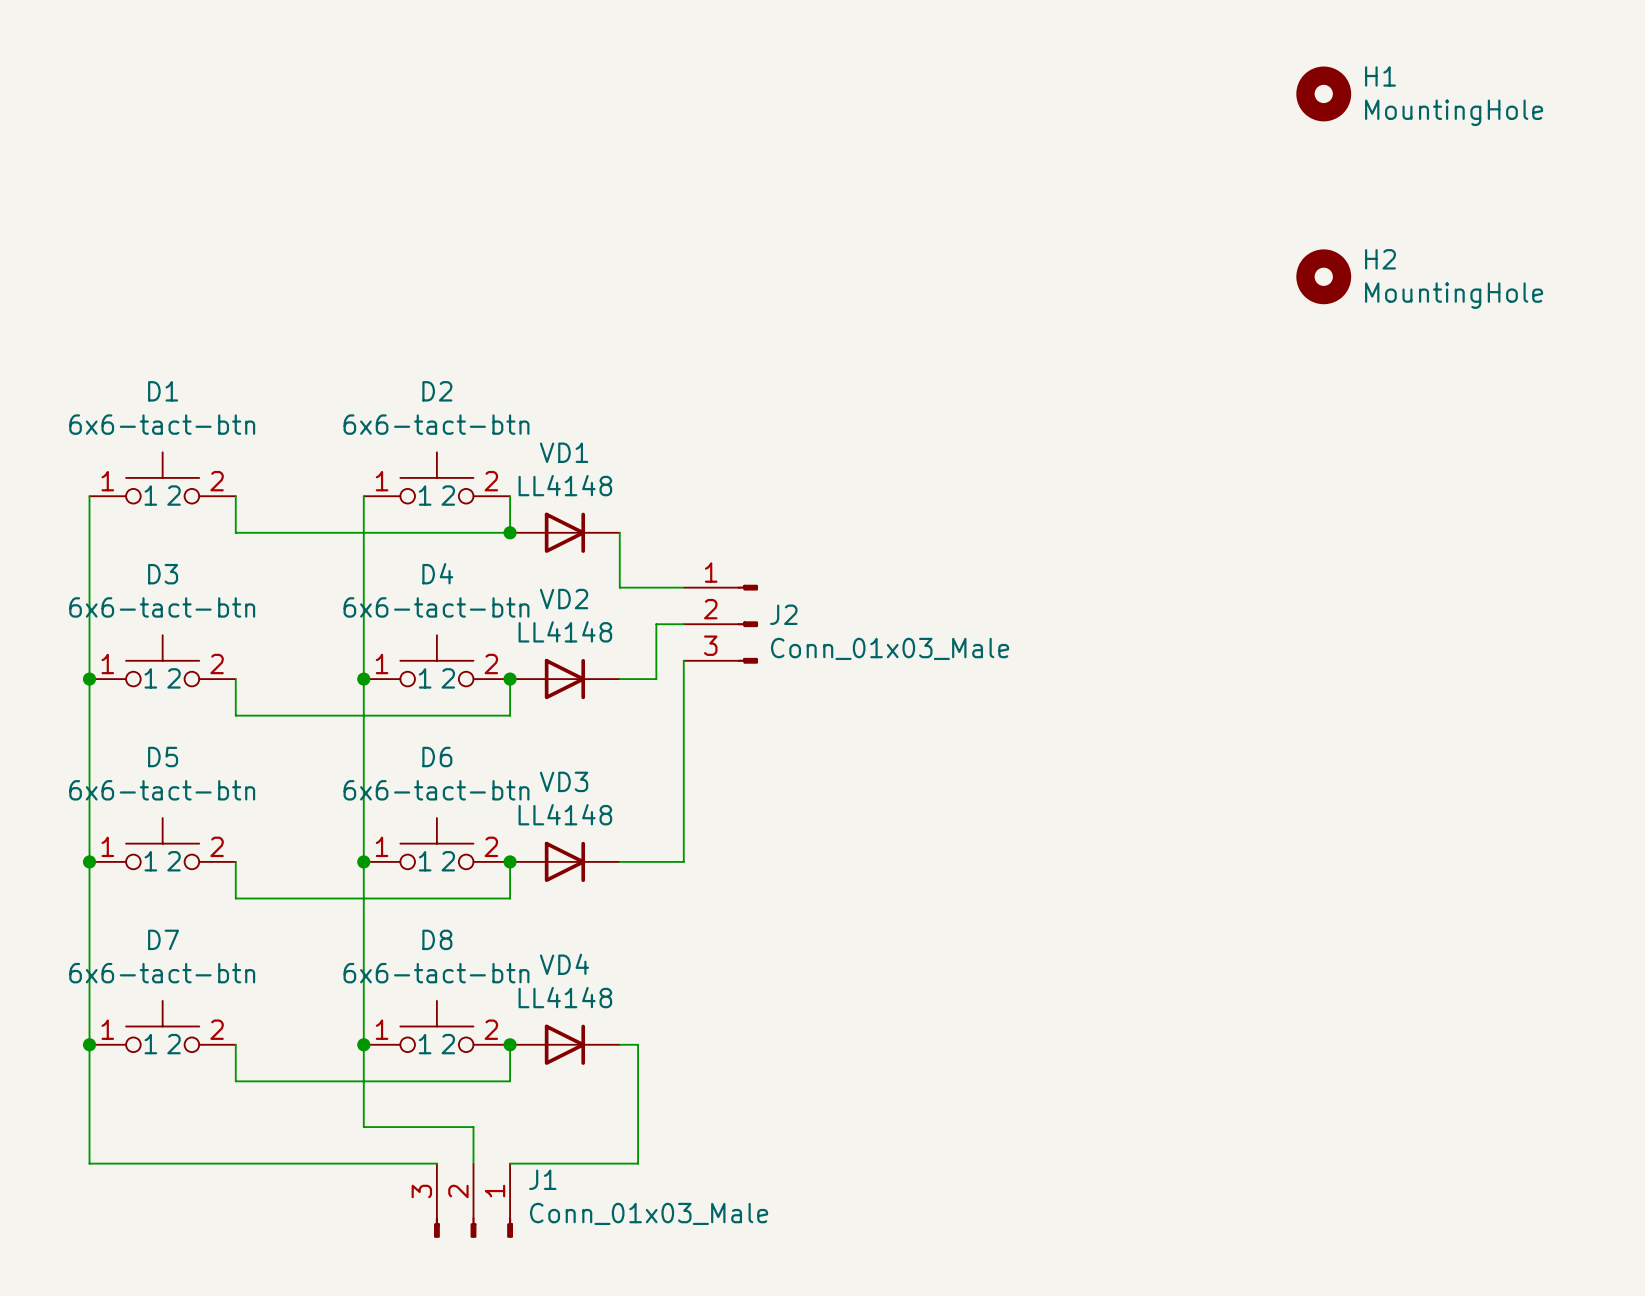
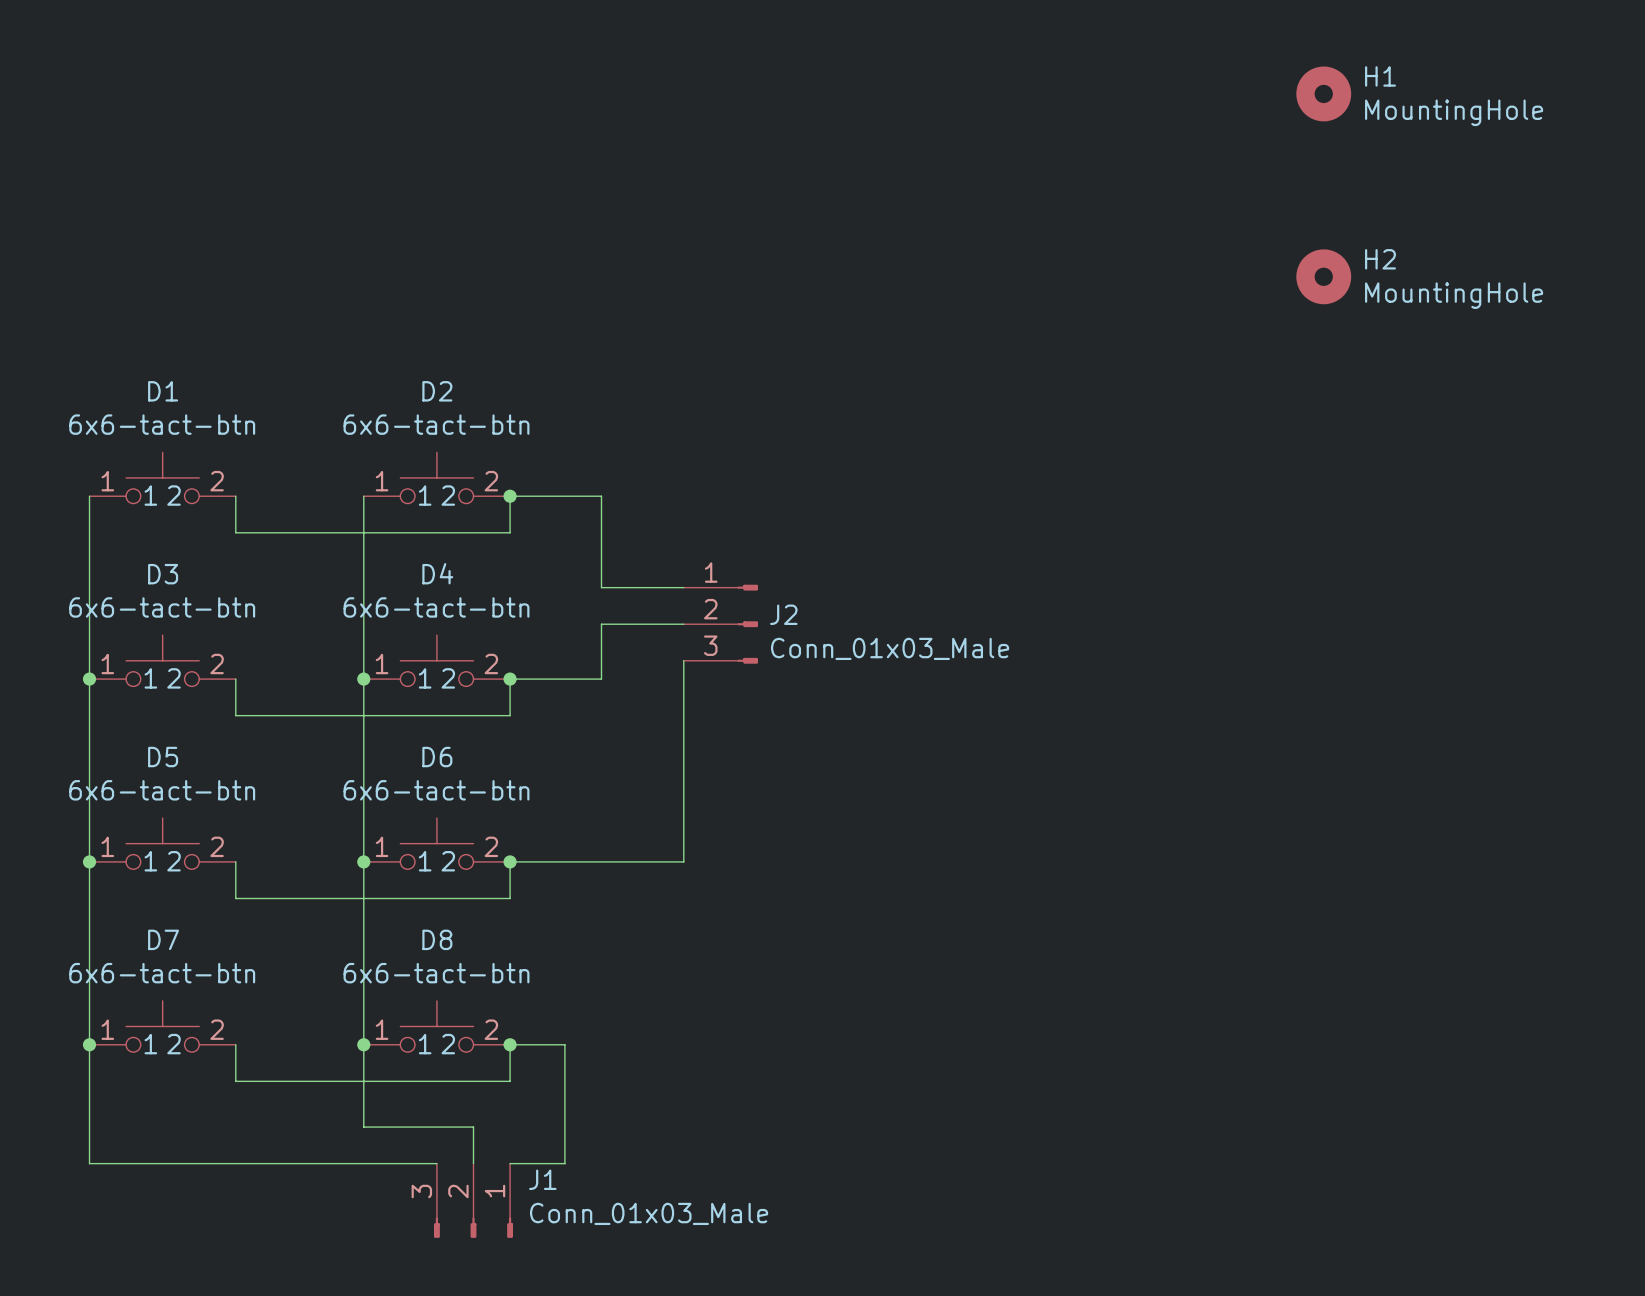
junction position: (510, 532) -> (510, 496)
VD1: LL4148 (564, 532) -> none
wire: (619, 532) (619, 587) -> (510, 496) (601, 496) (601, 587) (619, 587)
wire: (656, 624) (656, 679) (619, 679) -> (656, 624) (601, 624) (601, 679) (510, 679)
VD2: LL4148 (564, 679) -> none
VD3: LL4148 (564, 861) -> none
VD4: LL4148 (564, 1044) -> none
wire: (619, 1044) (638, 1044) (638, 1163) (564, 1163) -> (510, 1044) (564, 1044) (564, 1163)

